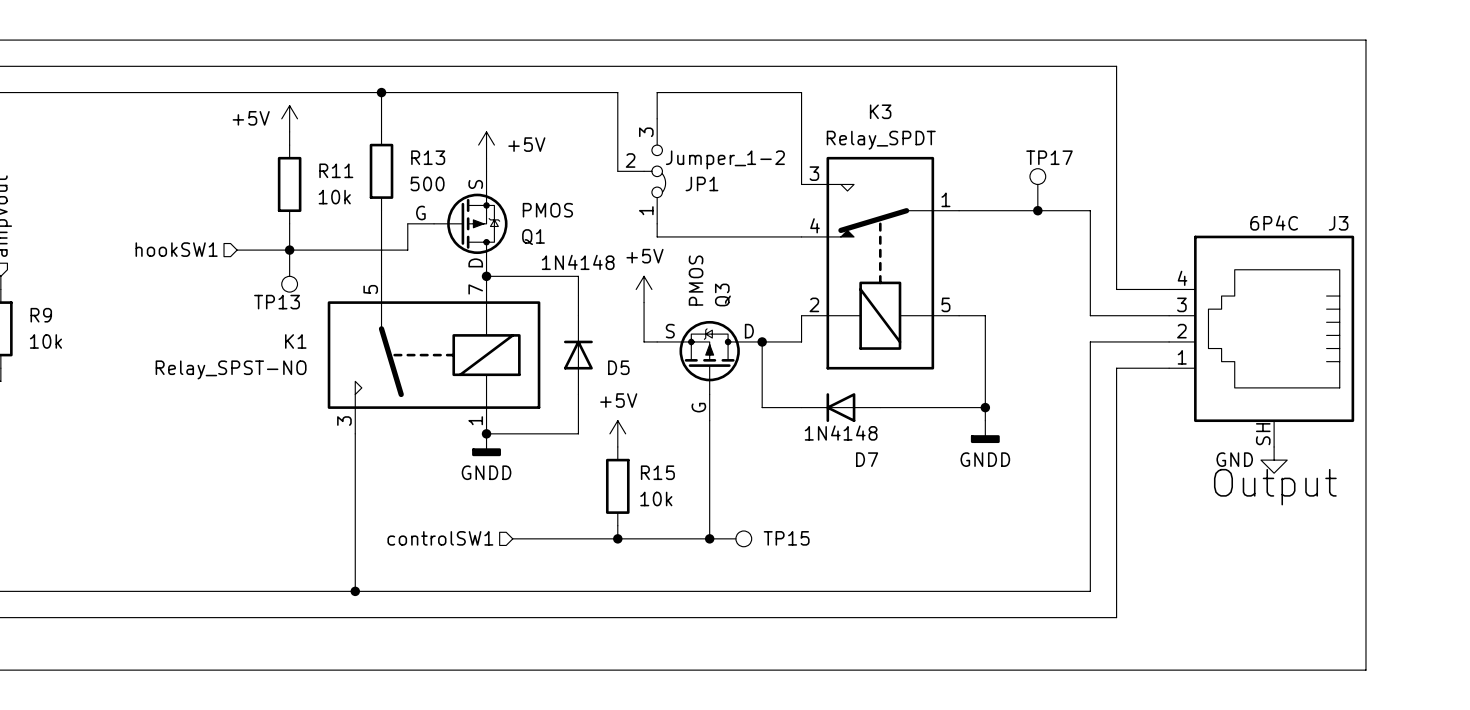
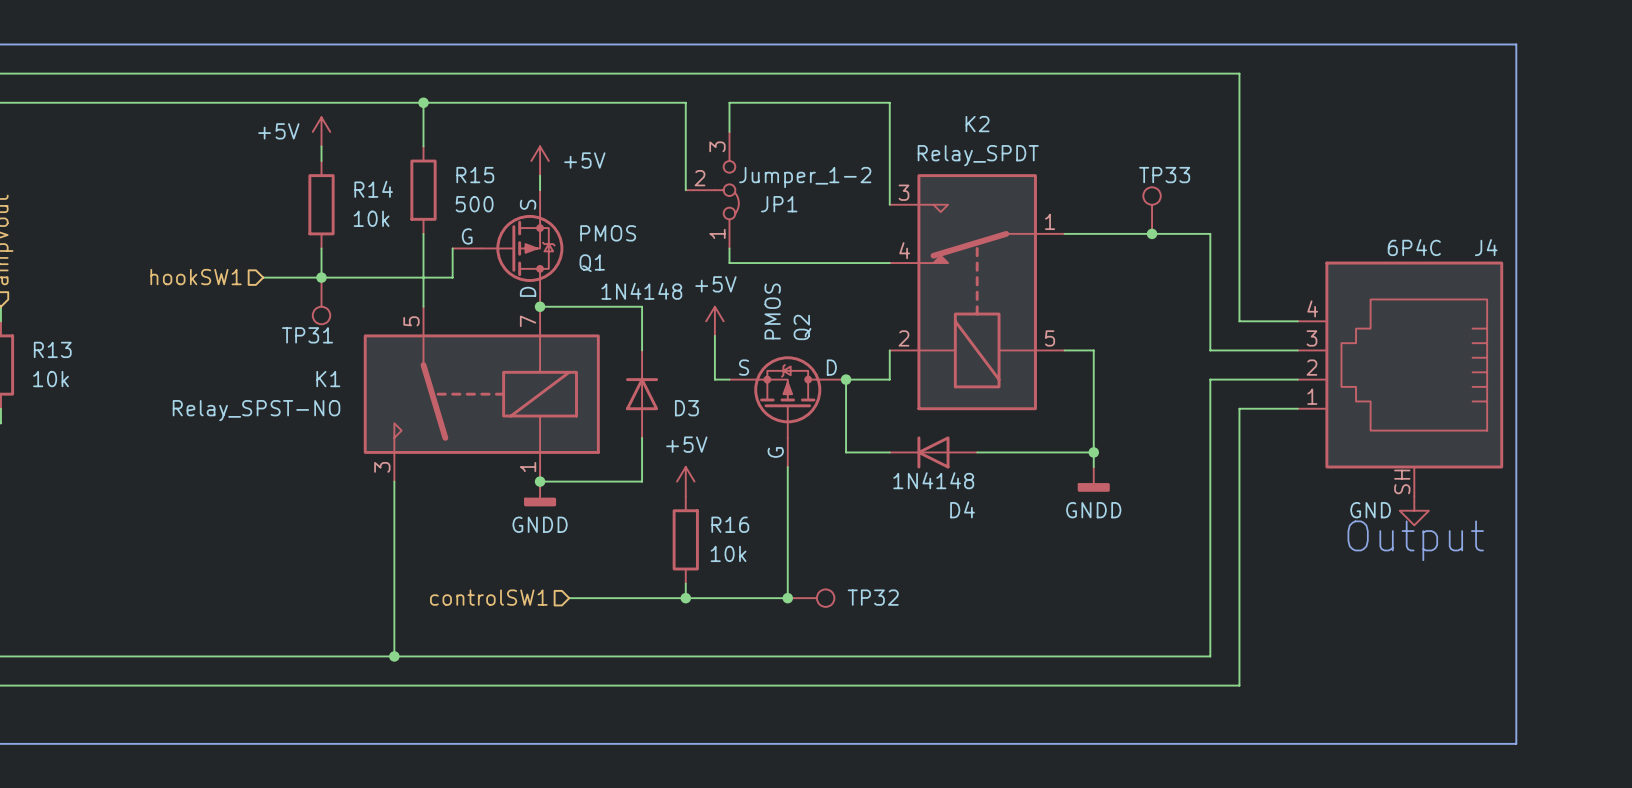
K3 name: K3 (880, 111) -> K2 (977, 124)
R13 name: R13 (428, 157) -> R15 (475, 175)
TP17 name: TP17 (1049, 157) -> TP33 (1164, 175)
R11 name: R11 (336, 170) -> R14 (373, 189)
J3 name: J3 (1338, 223) -> J4 (1486, 247)
Q3 name: Q3 (722, 294) -> Q2 (802, 327)
TP13 name: TP13 (277, 302) -> TP31 (307, 335)
R9 name: R9 (41, 315) -> R13 (52, 349)
D5 name: D5 (618, 367) -> D3 (686, 408)
D7 name: D7 (867, 459) -> D4 (962, 509)
R15 name: R15 (657, 472) -> R16 (730, 524)
TP15 name: TP15 (786, 538) -> TP32 (873, 597)

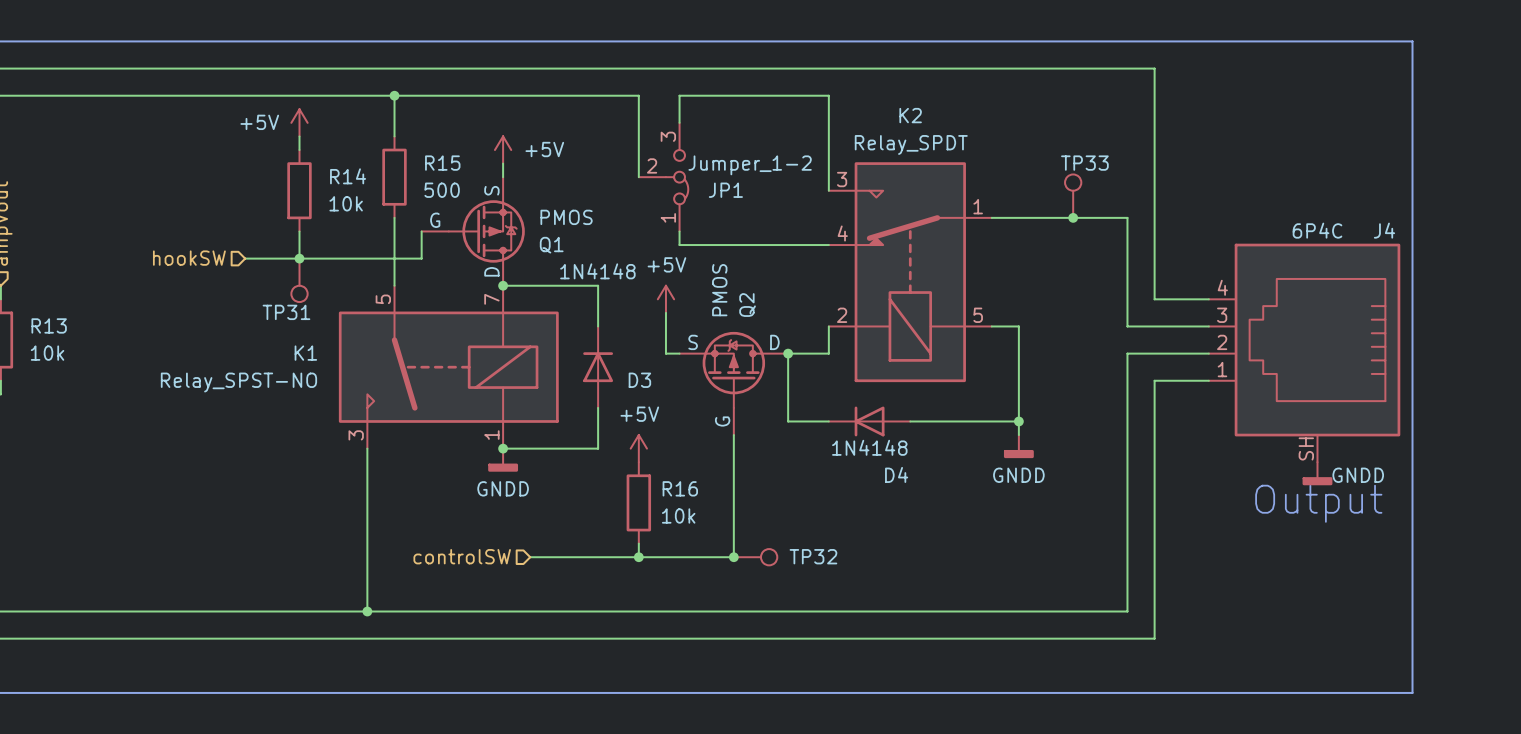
hierarchical label: hookSW1 (196, 277) -> hookSW (189, 258)
power symbol: GND (1414, 510) -> GNDD (1317, 473)
hierarchical label: controlSW1 (488, 597) -> controlSW (462, 556)

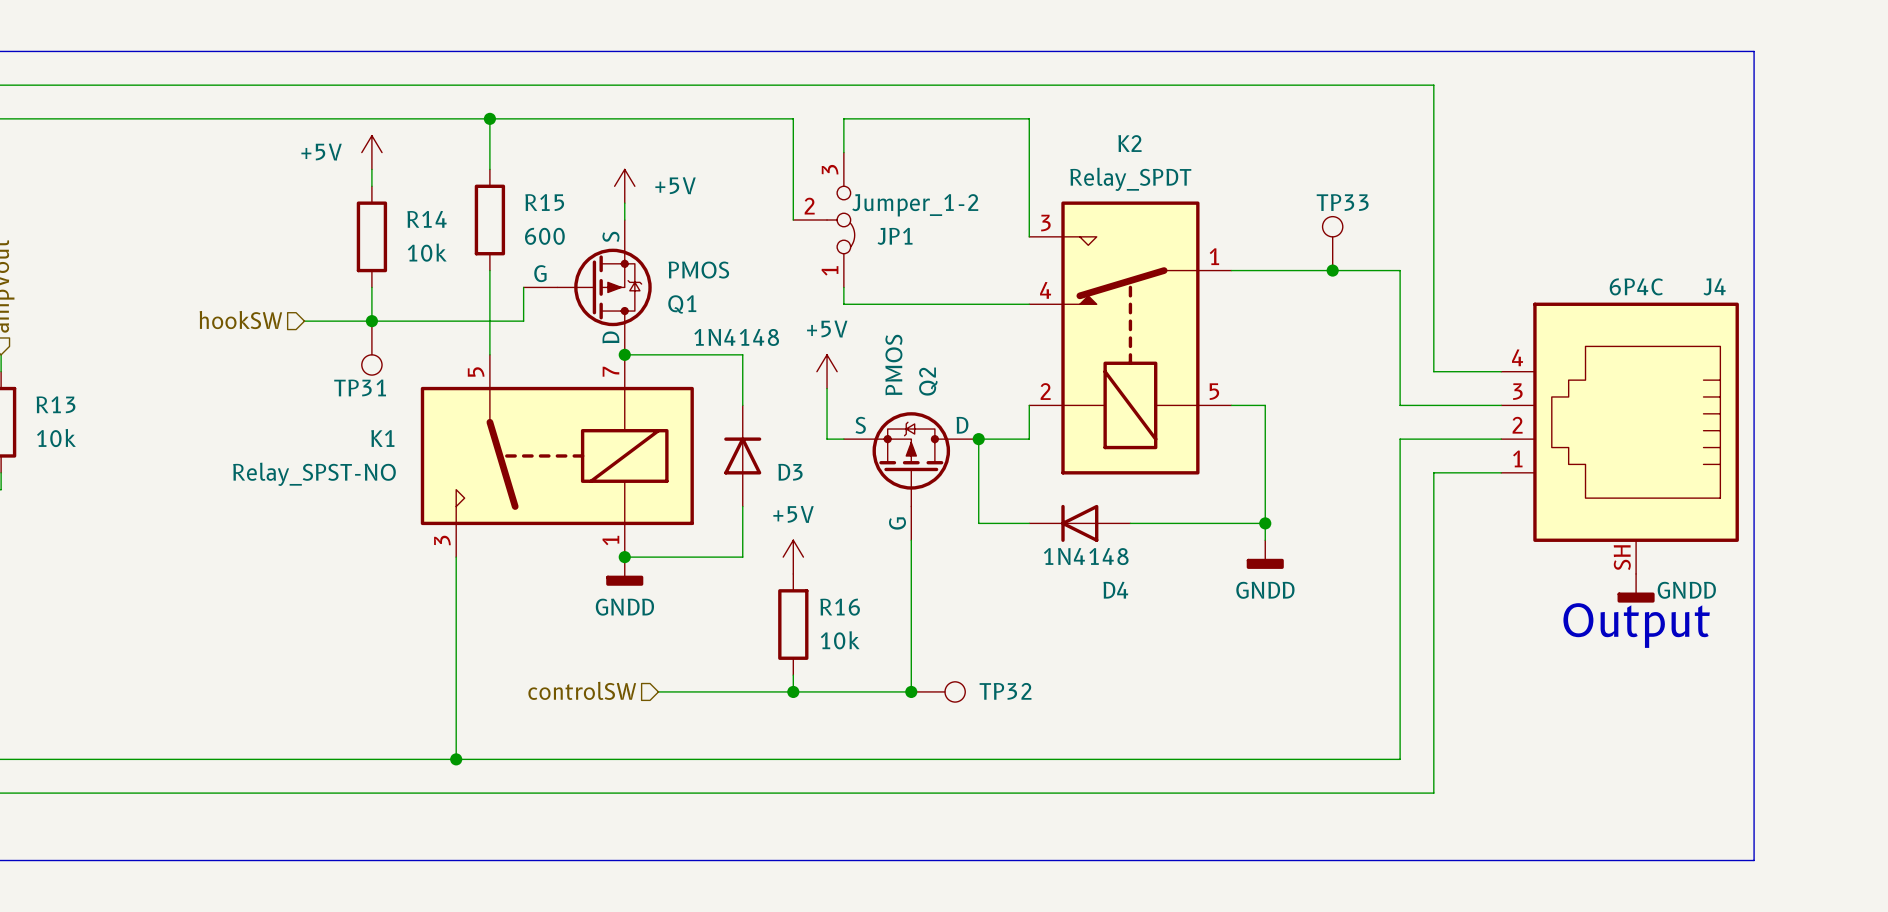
R15 value: 500 (442, 190) -> 600 (544, 236)

